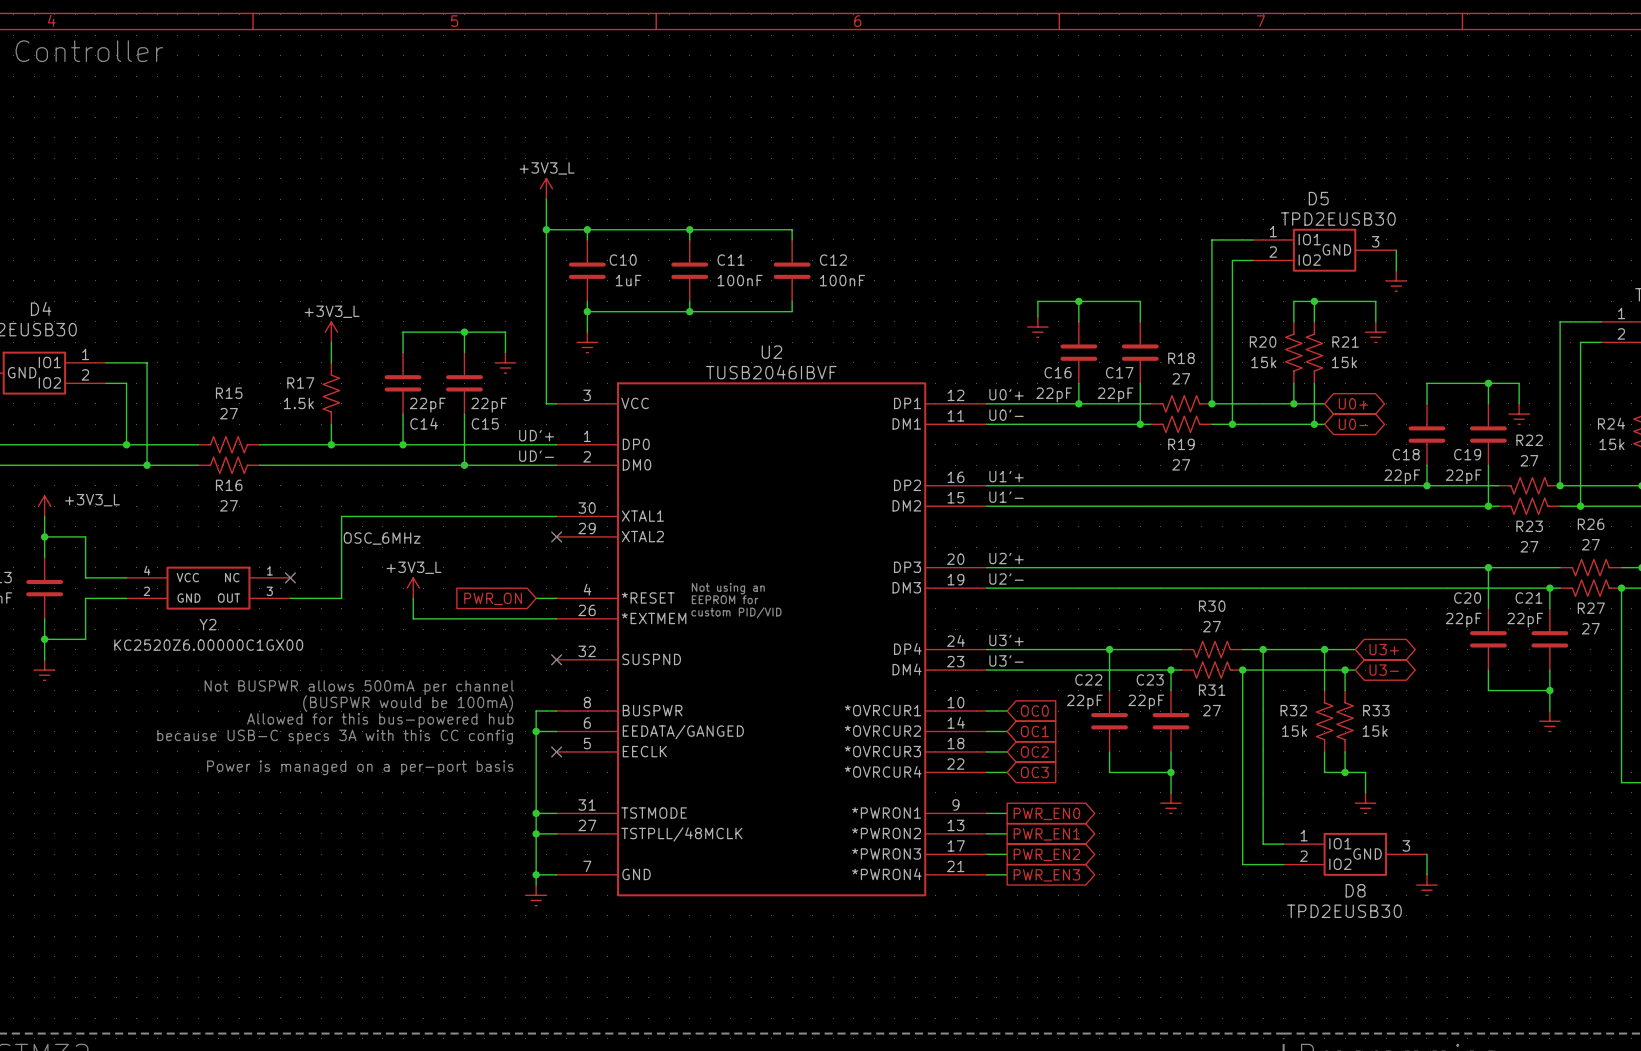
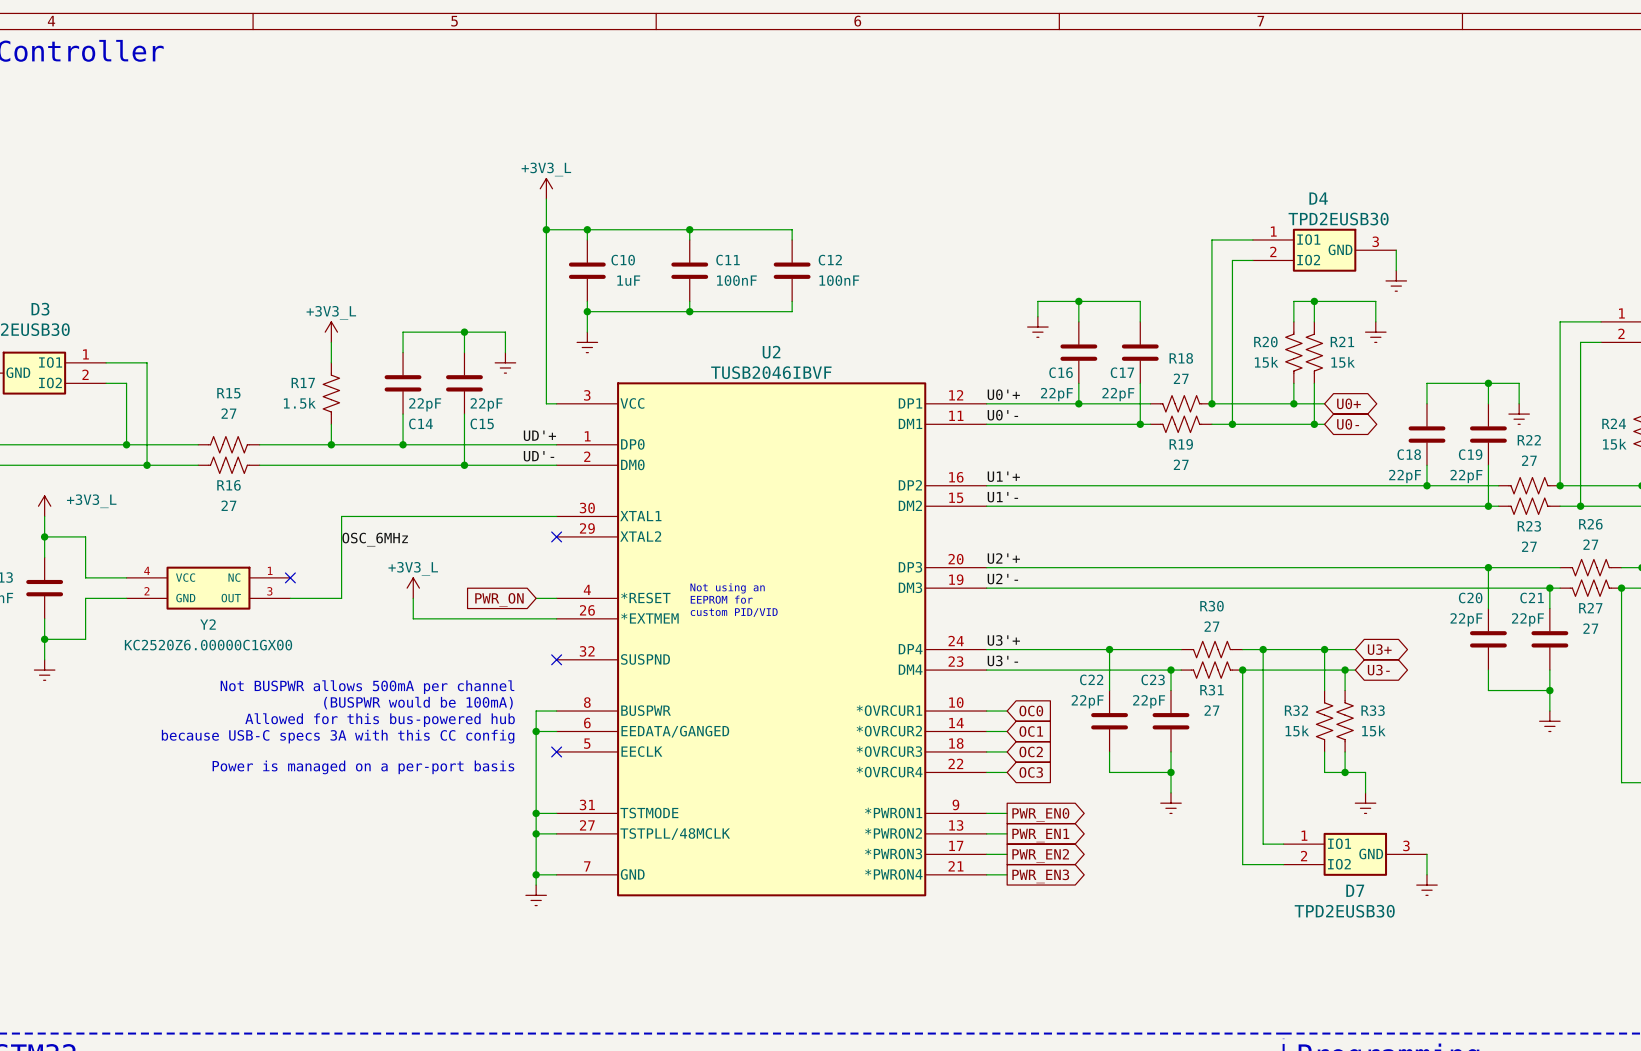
D5 name: D5 (1318, 198) -> D4 (1318, 198)
D4 name: D4 (41, 308) -> D3 (40, 309)
D8 name: D8 (1355, 890) -> D7 (1355, 890)

